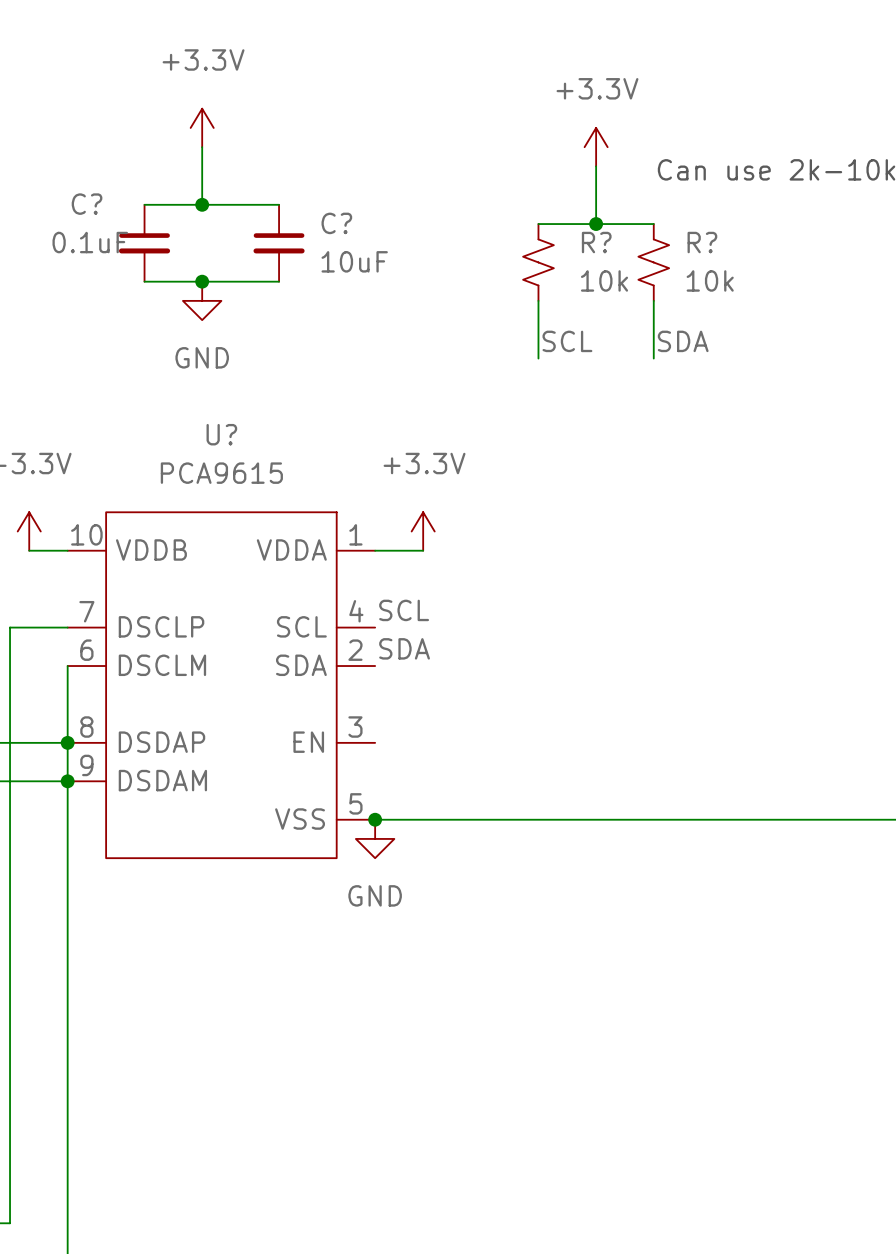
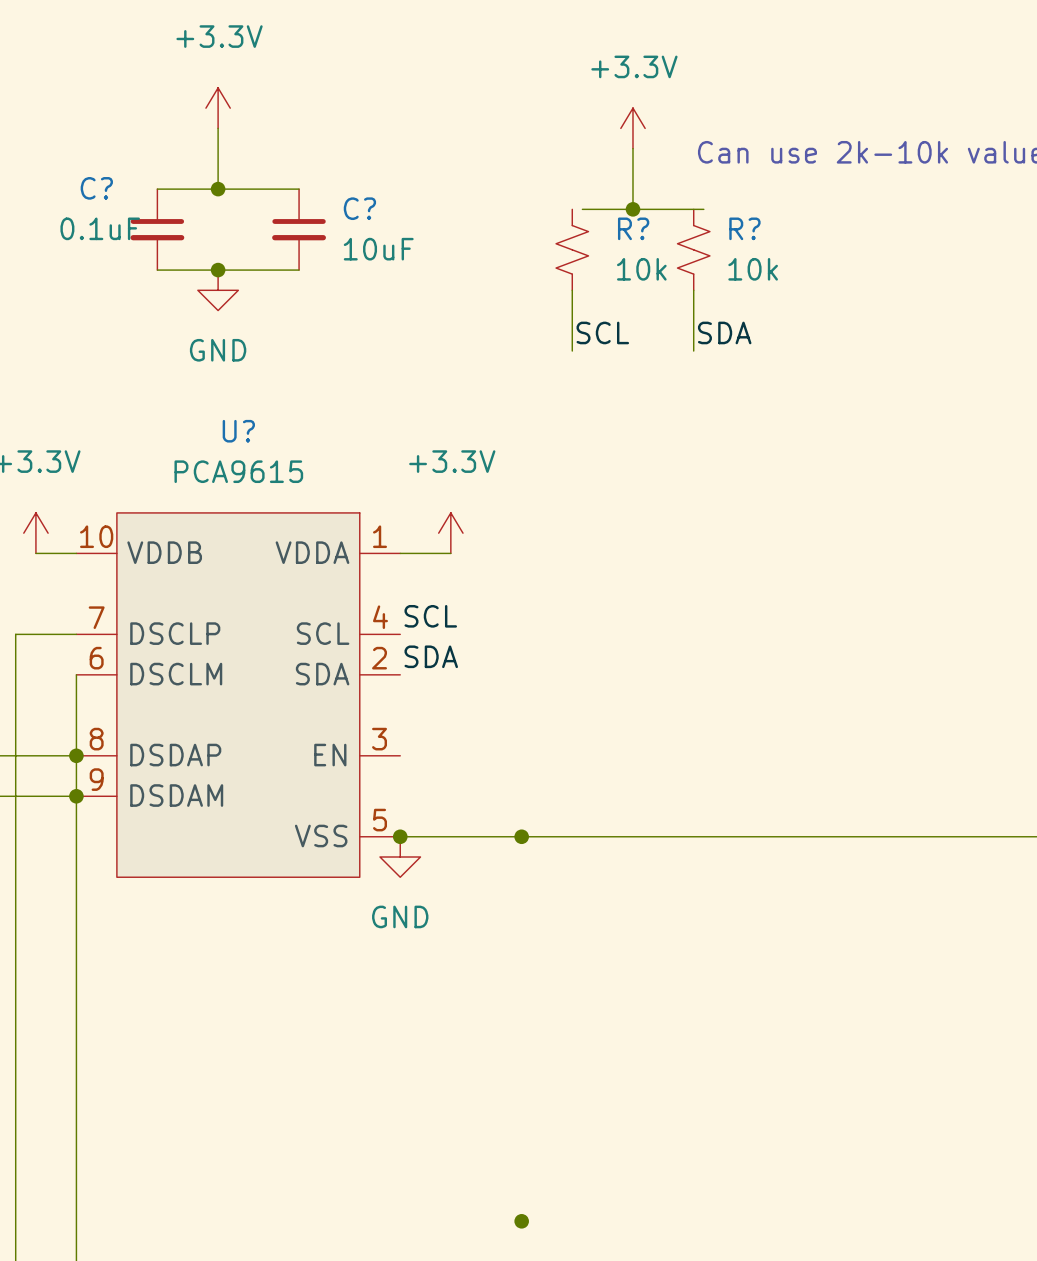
wire: (538, 224) (548, 224) -> (693, 209) (703, 209)
junction: none -> (521, 836)
junction: none -> (521, 1221)

